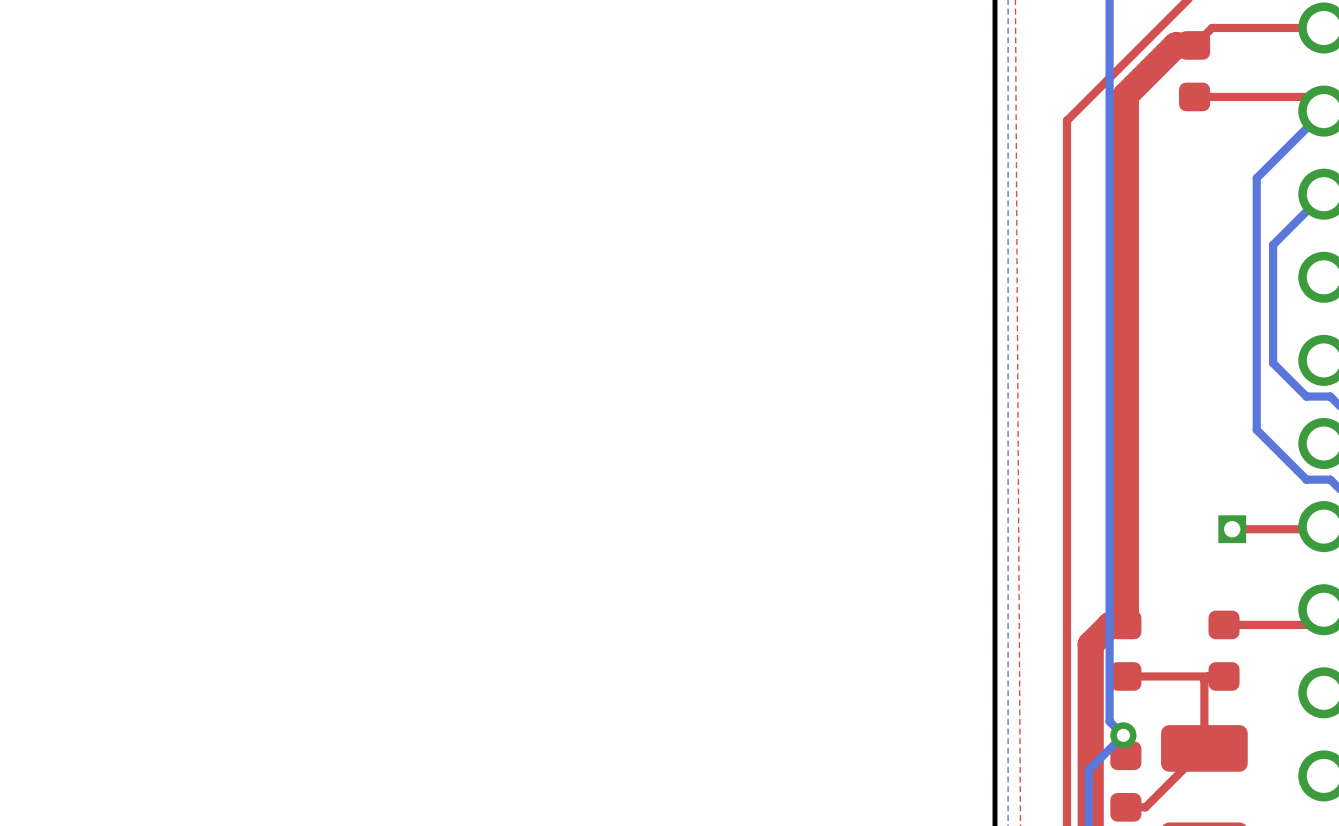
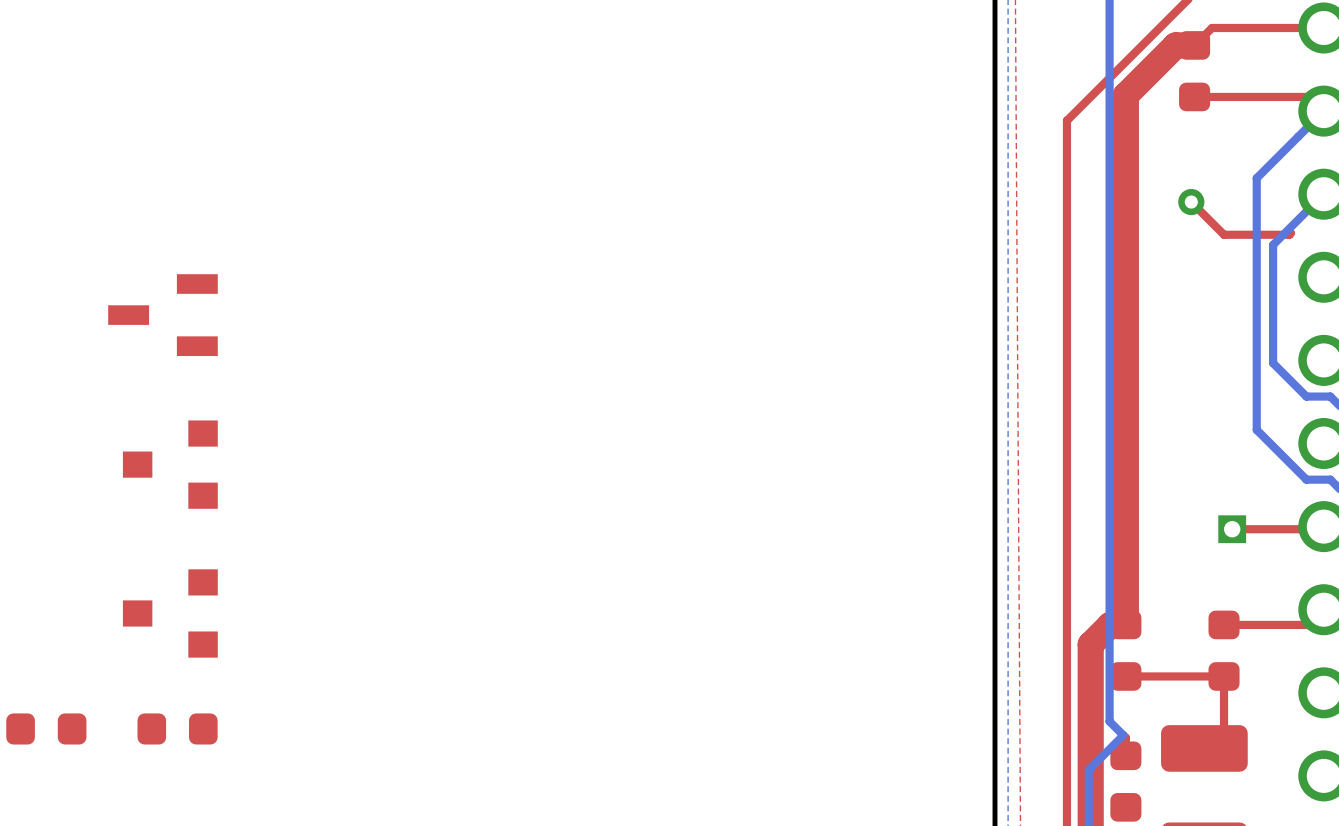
top track: none -> (1191, 202) (1224, 234) (1289, 234) (1291, 233)
via: none -> (1191, 202)
part: none -> (162, 315)
part: none -> (170, 464)
part: none -> (170, 613)
top track: (1208, 676) (1204, 680) (1204, 748) (1145, 807) (1125, 807) -> none
top track: none -> (1224, 676) (1224, 741)
part: none -> (46, 728)
part: none -> (177, 728)
via: (1123, 735) -> none

